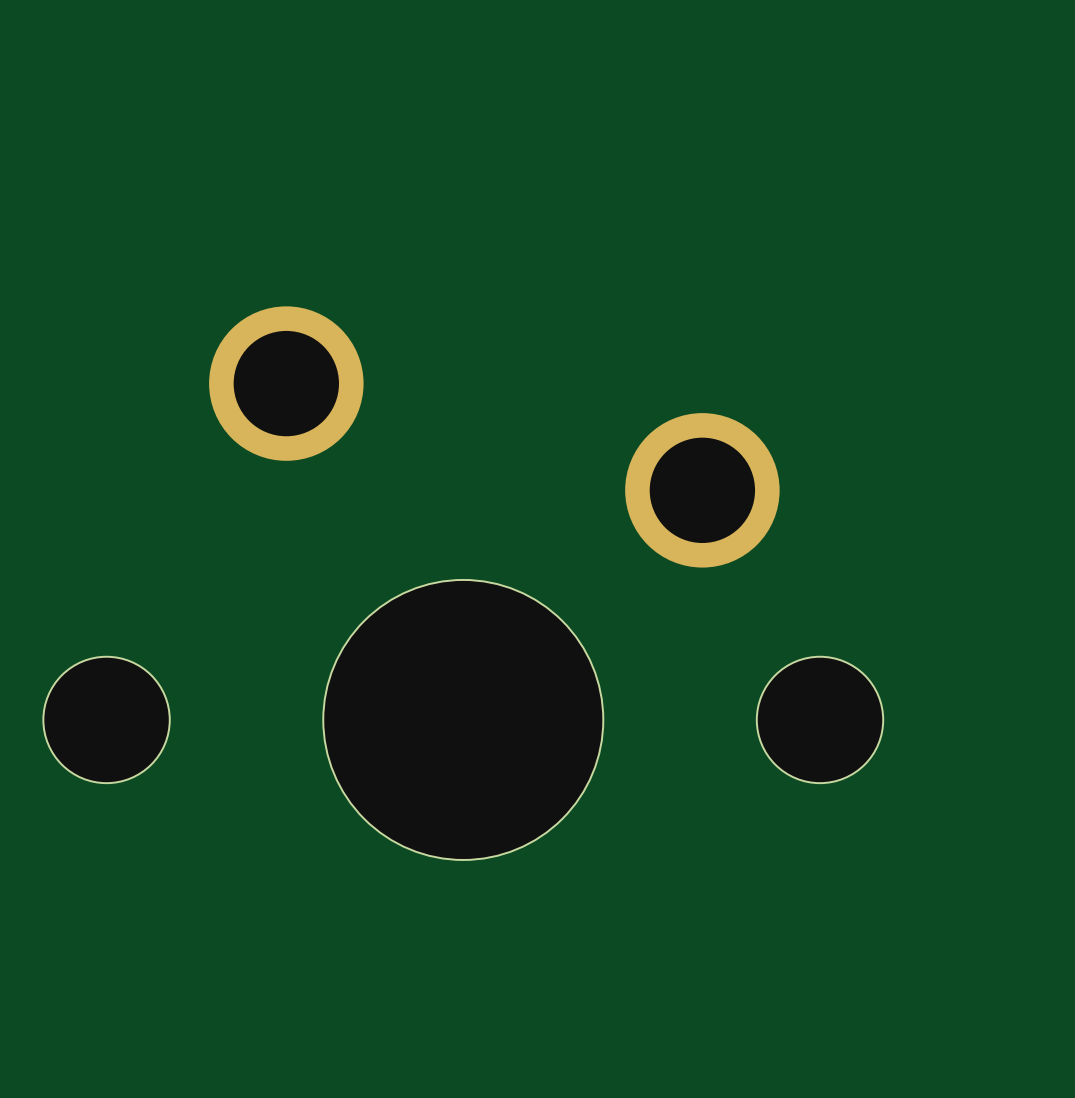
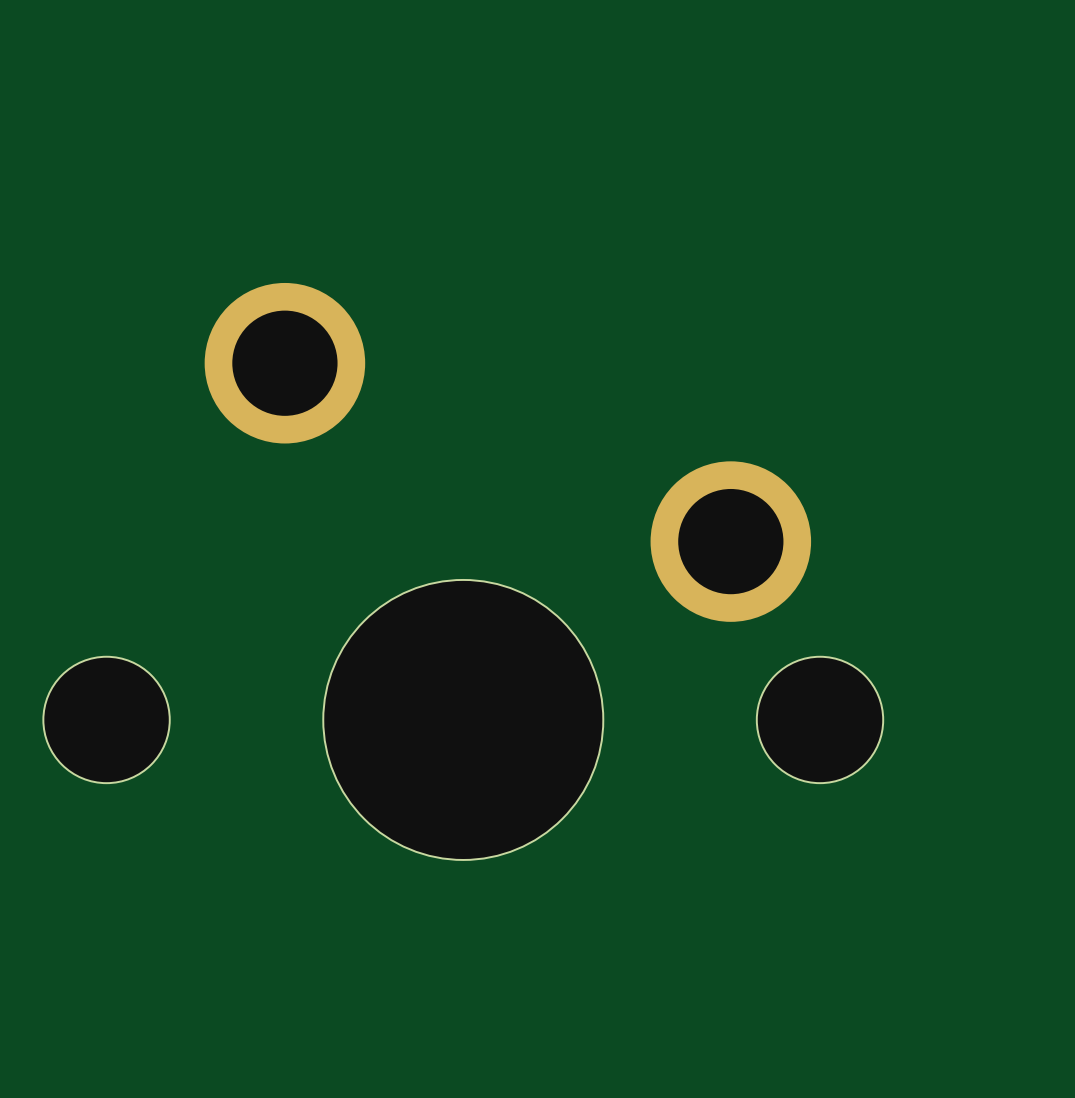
part footprint: [43, 306, 884, 860] -> [43, 282, 884, 860]

